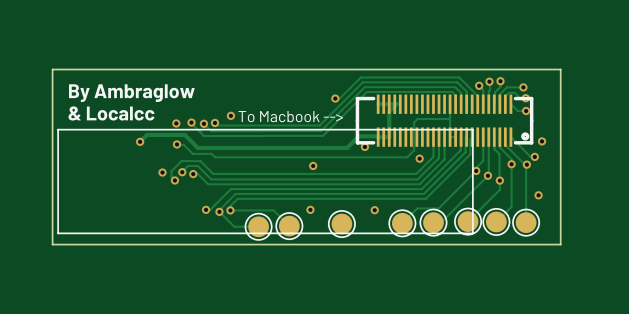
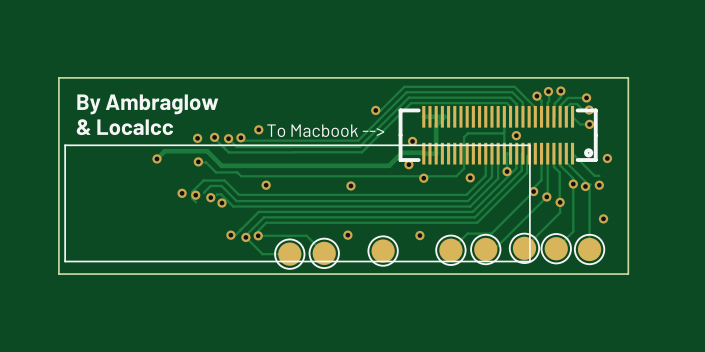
via: none -> (516, 135)
via: none -> (412, 141)
track: none -> (507, 153) (507, 171)
via: none -> (507, 171)
via: (534, 156) -> none
via: none -> (423, 178)
via: (526, 164) -> none
via: none -> (266, 185)
via: none -> (599, 185)
via: none -> (585, 186)
via: (182, 172) -> none
via: none -> (195, 195)
via: (193, 174) -> none
via: none -> (210, 197)
via: (174, 180) -> none
via: none -> (221, 203)

